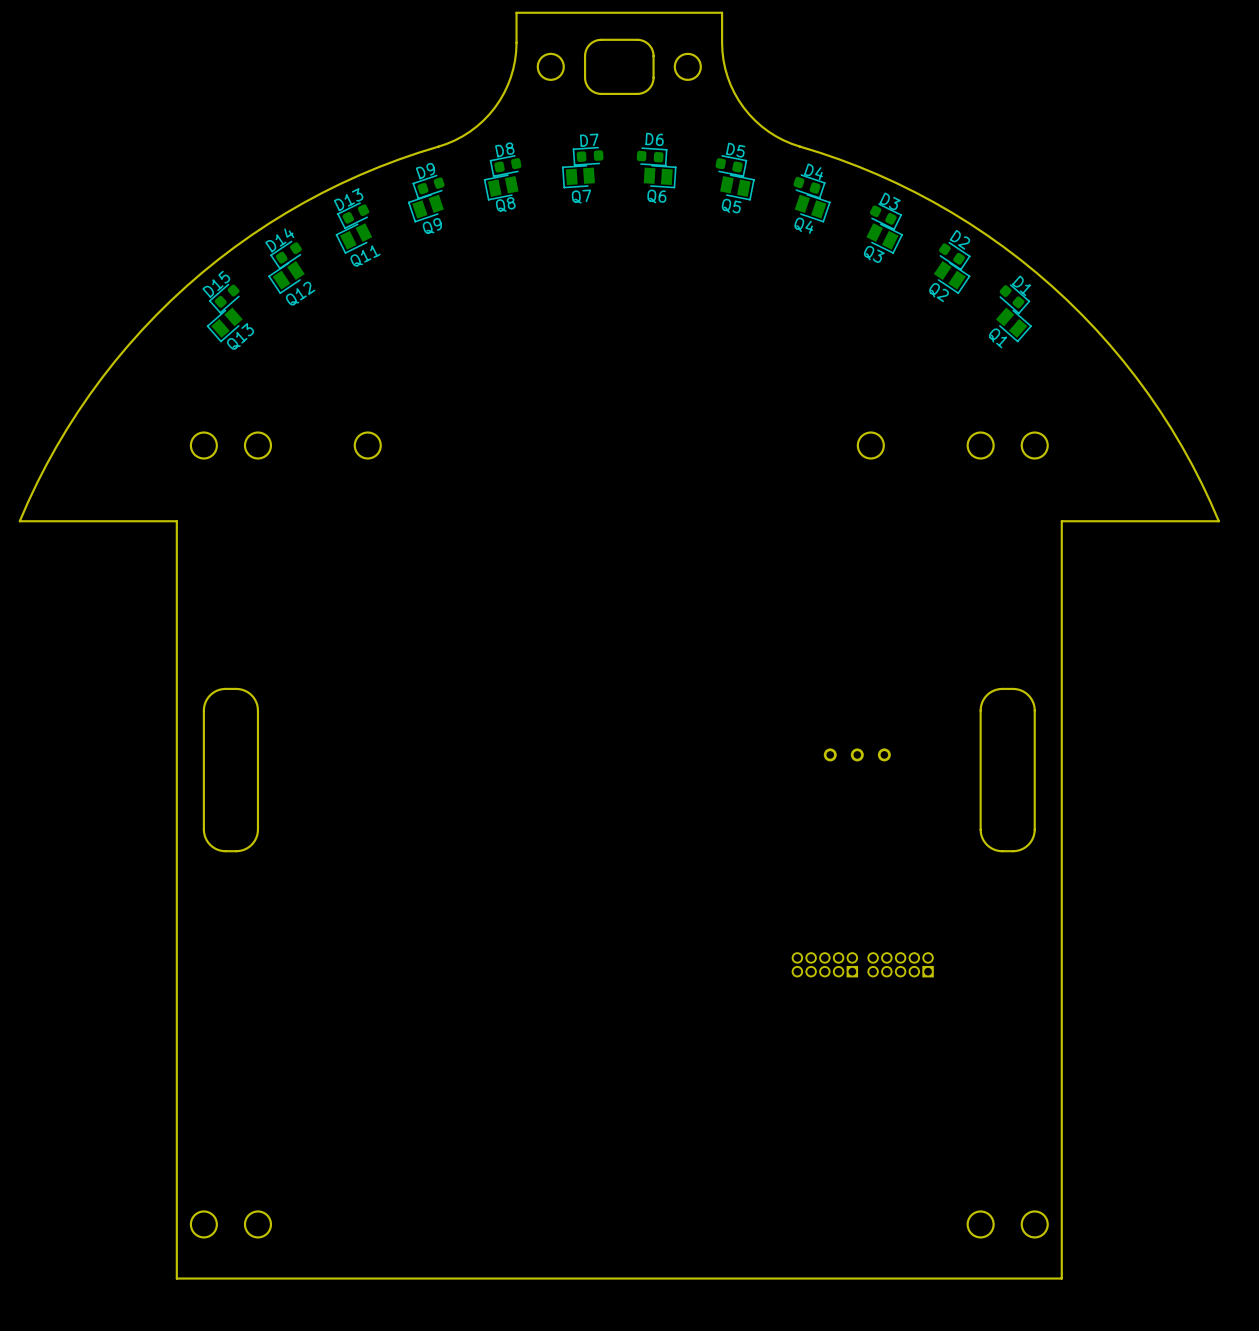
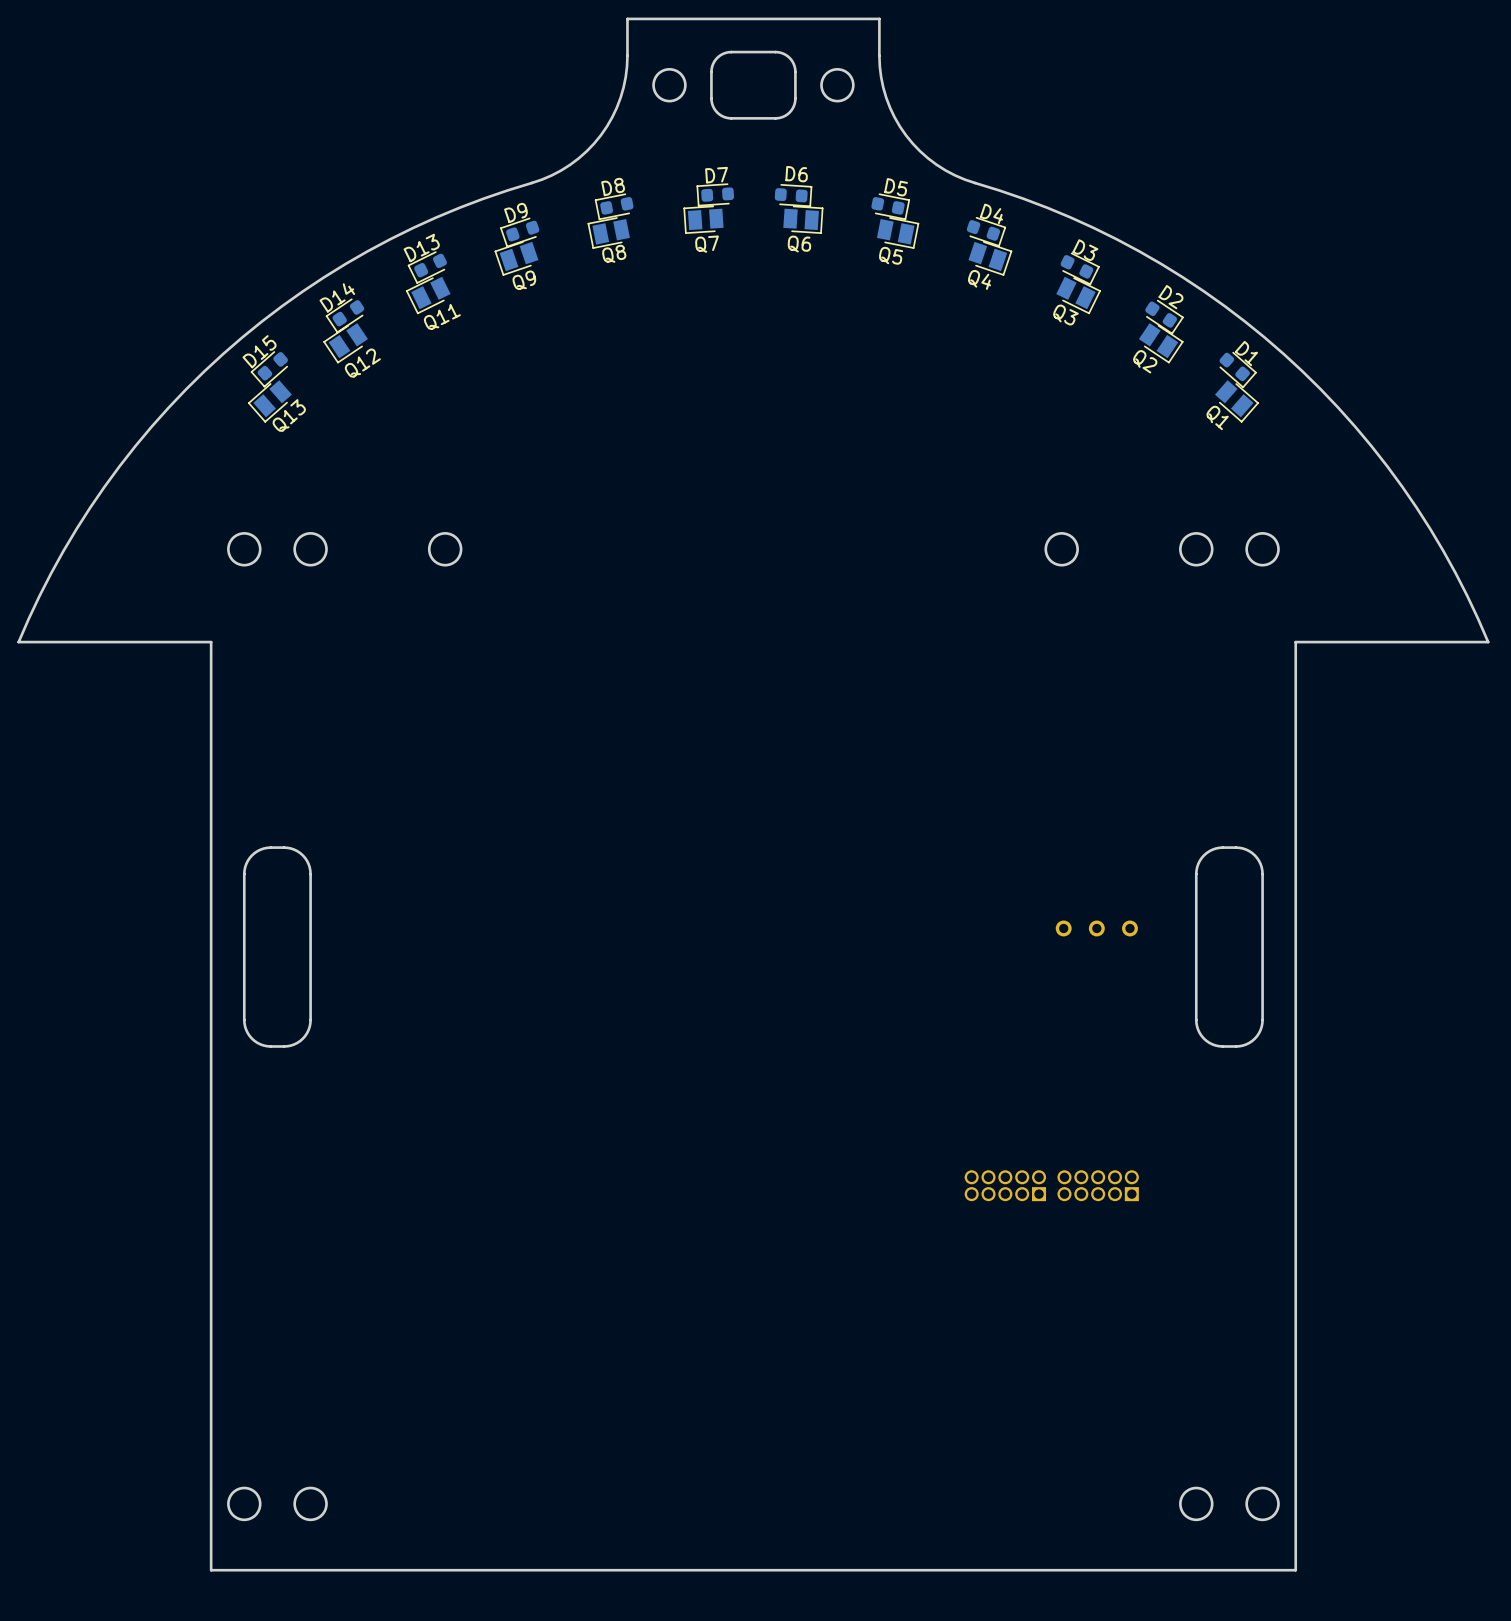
part position: (857, 754) -> (1096, 928)

